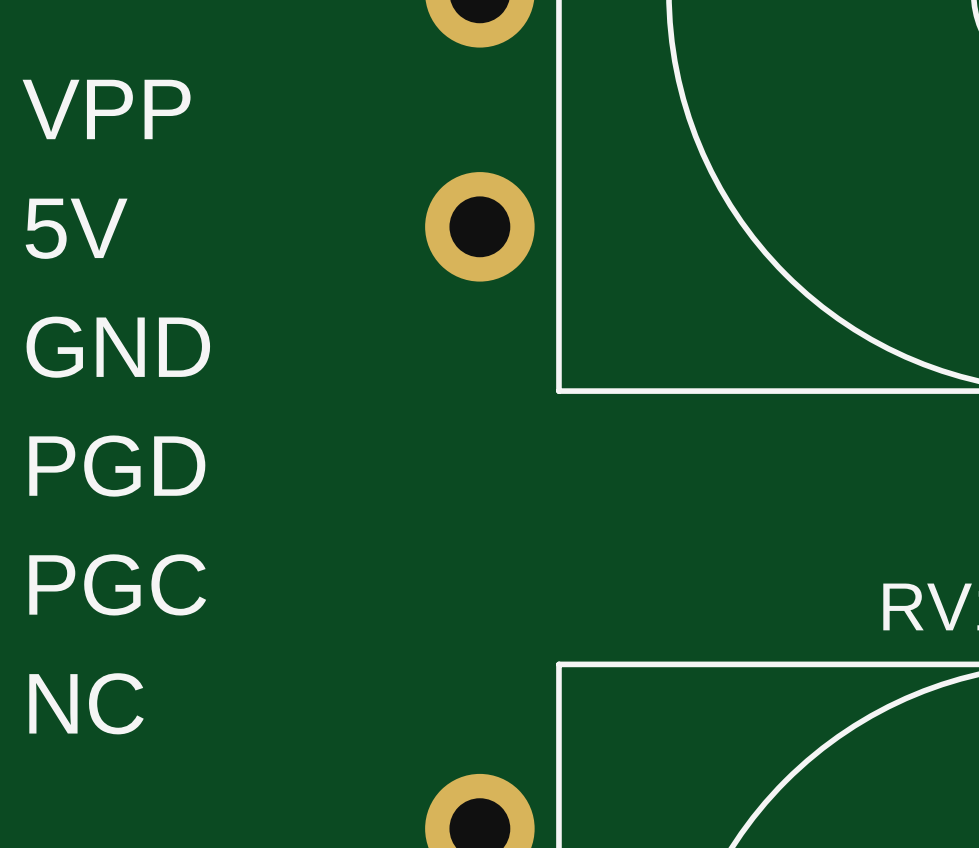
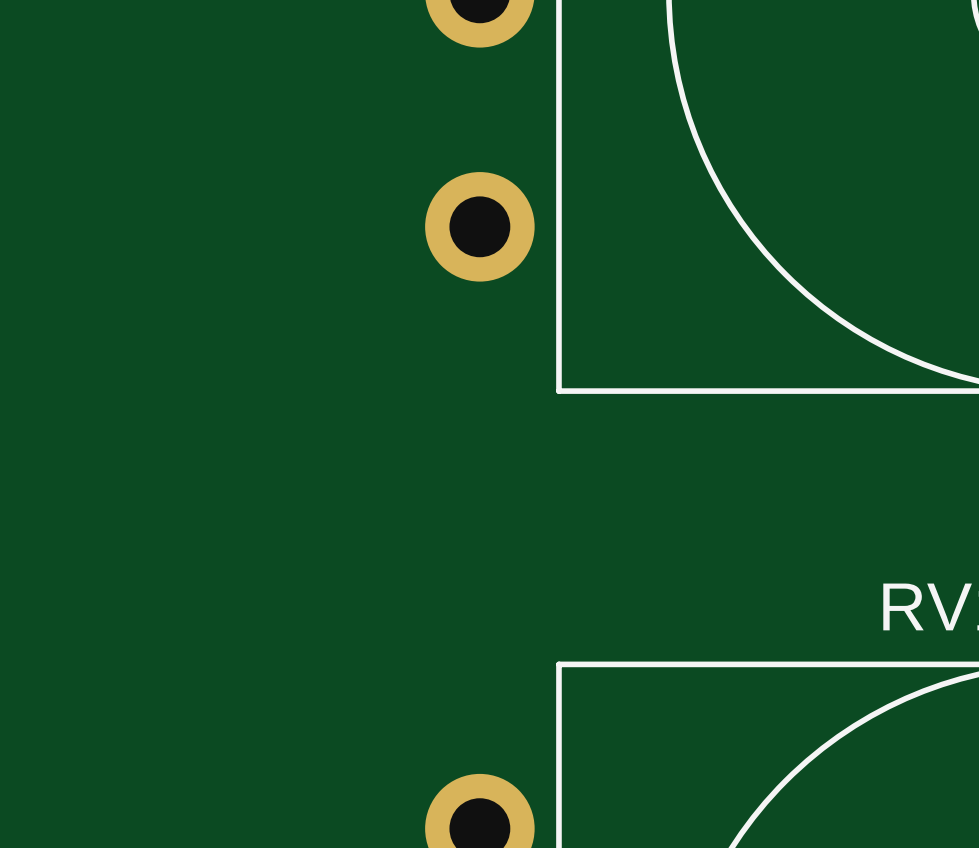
text: VPP (106, 109) -> none
text: 5V (76, 228) -> none
text: GND (118, 347) -> none
text: PGD (117, 466) -> none
text: PGC (117, 584) -> none
text: NC (86, 703) -> none

